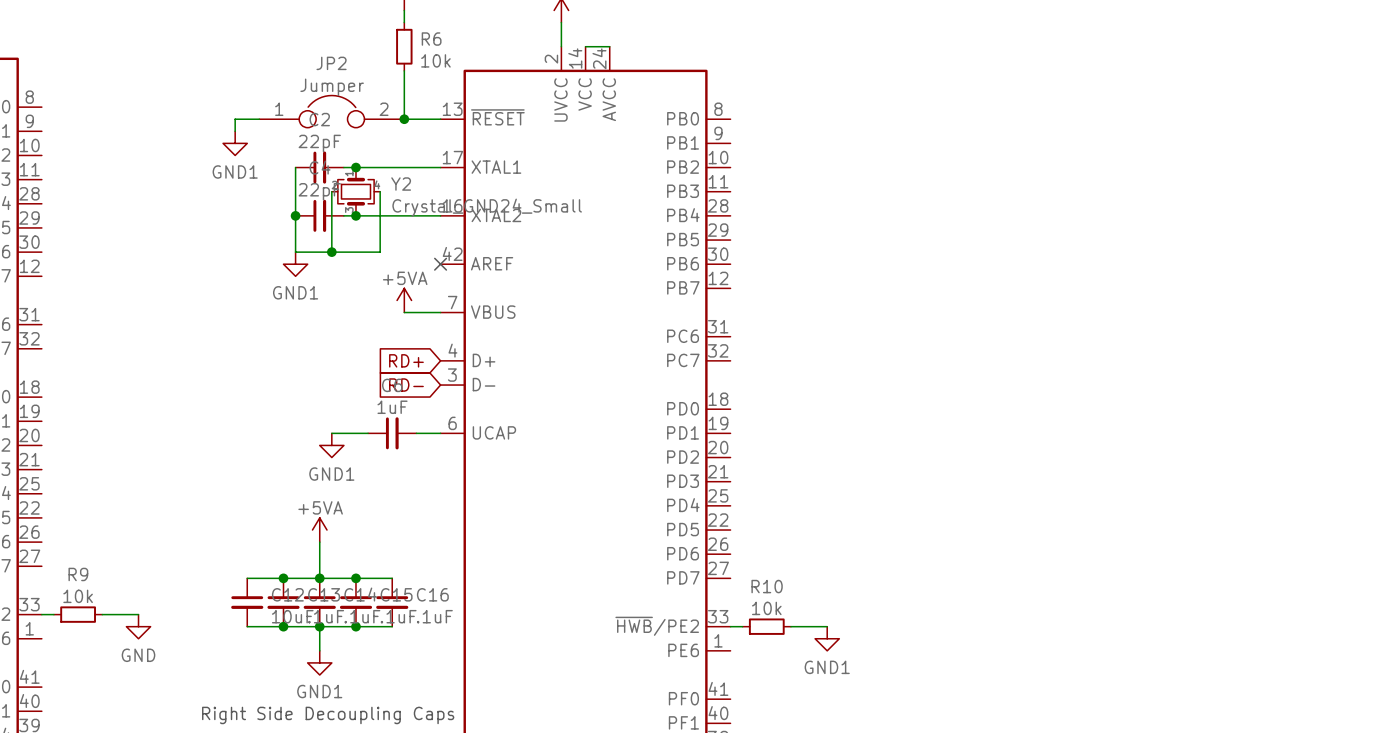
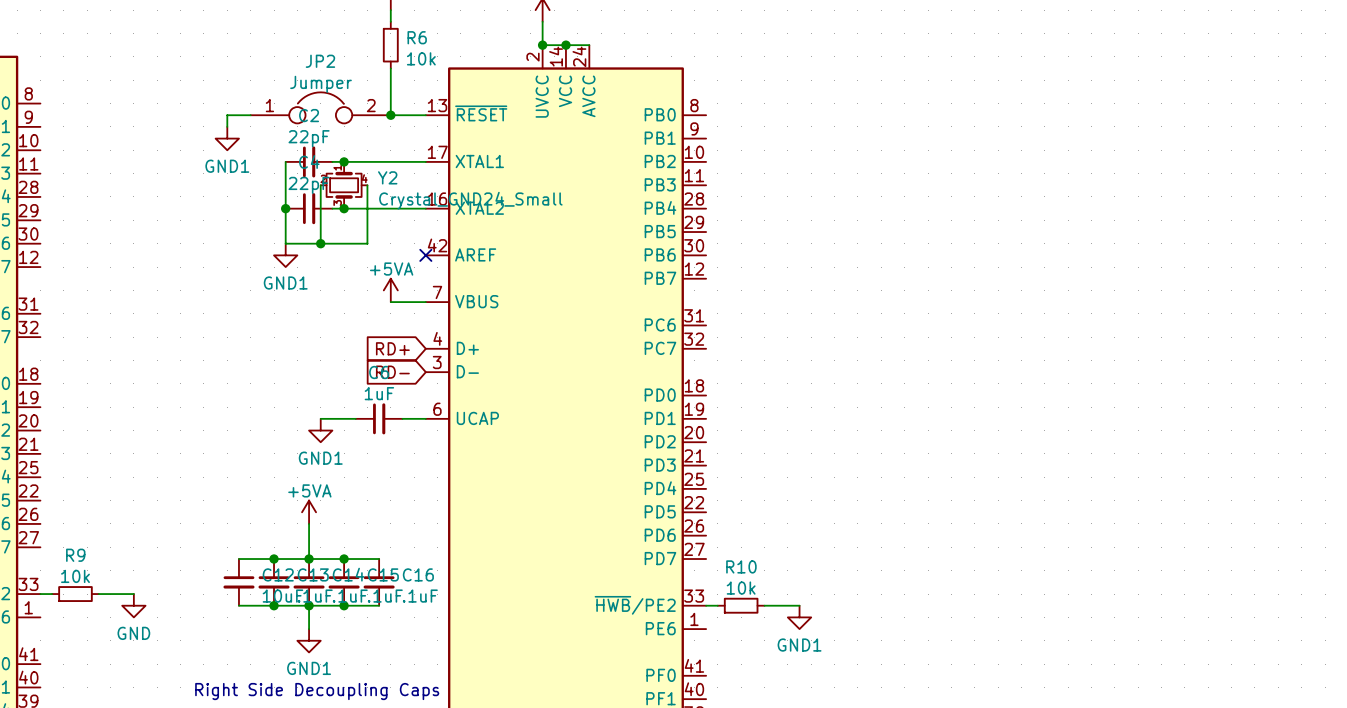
wire: none -> (542, 45) (565, 45)
junction: none -> (542, 45)
junction: none -> (565, 45)

